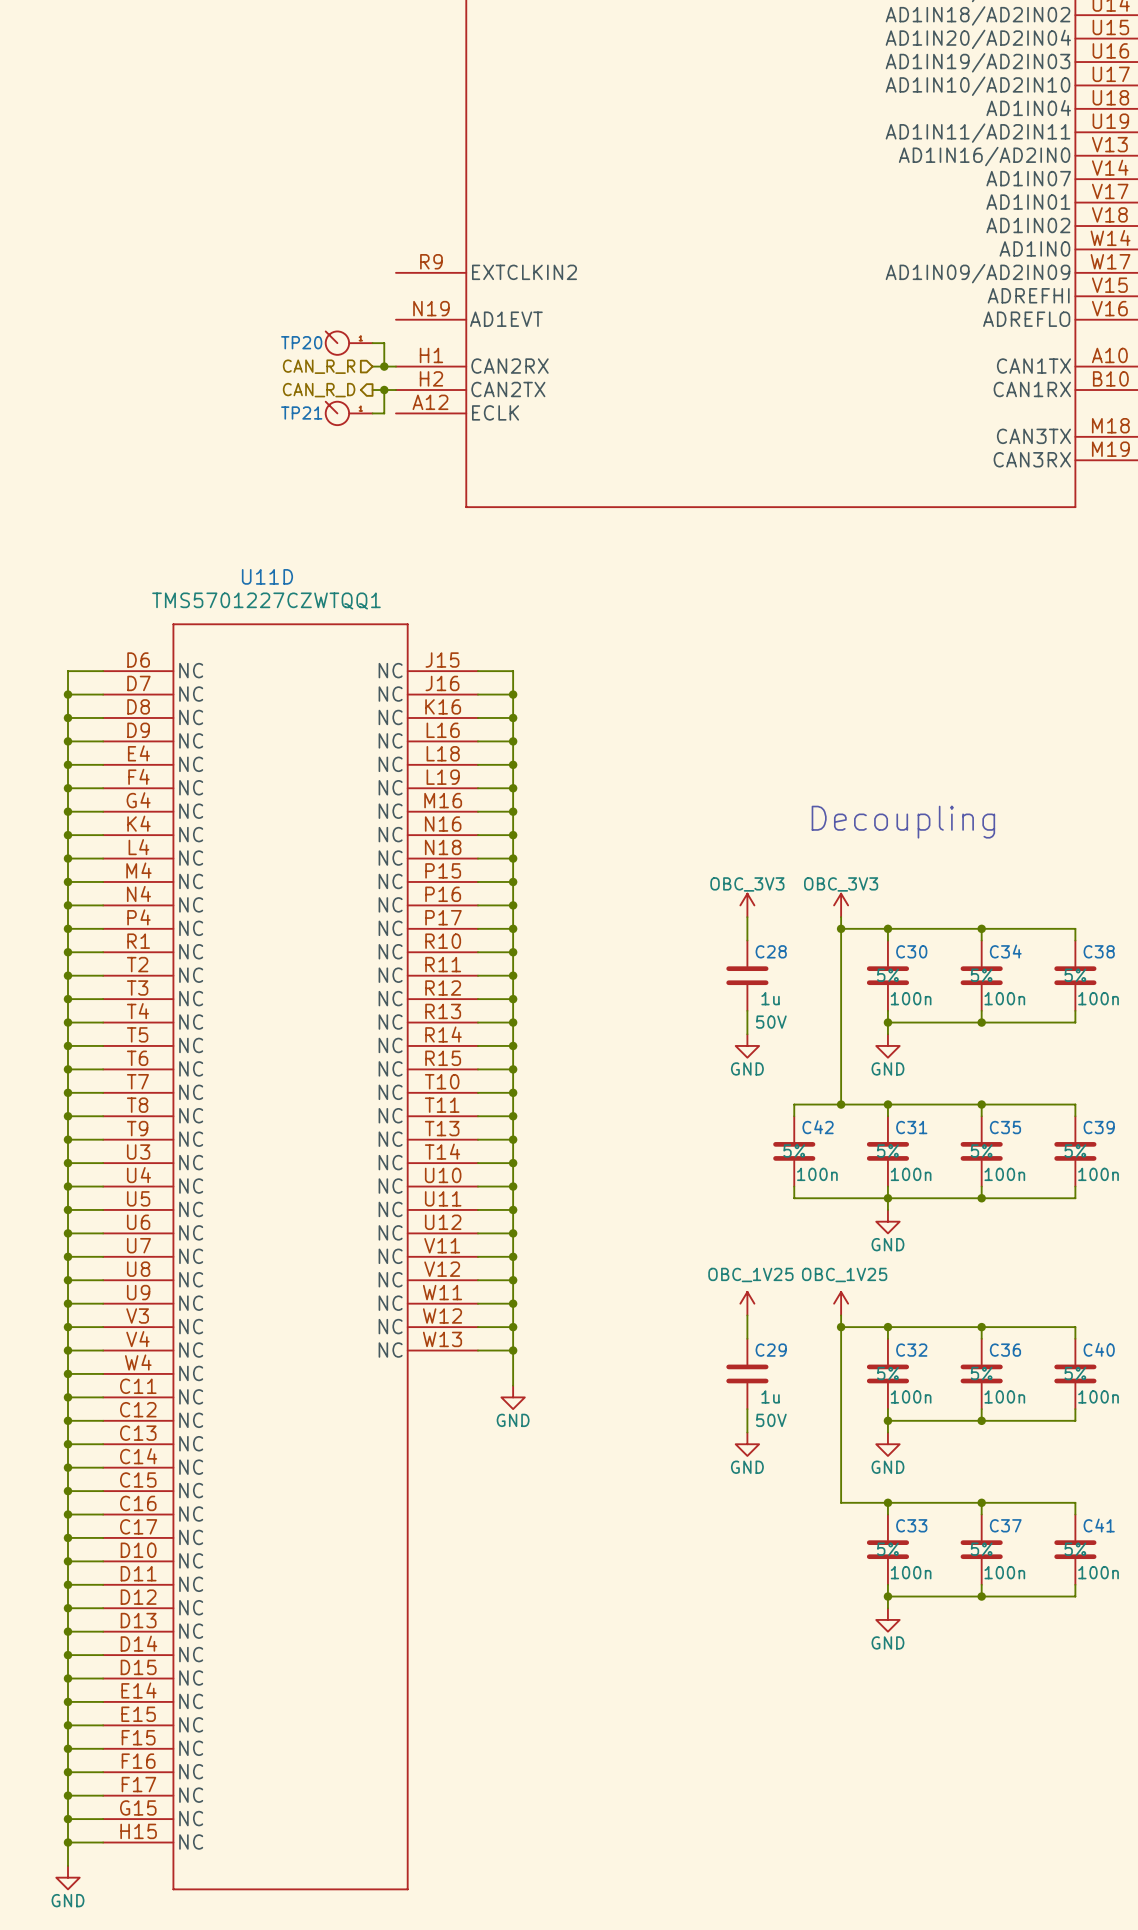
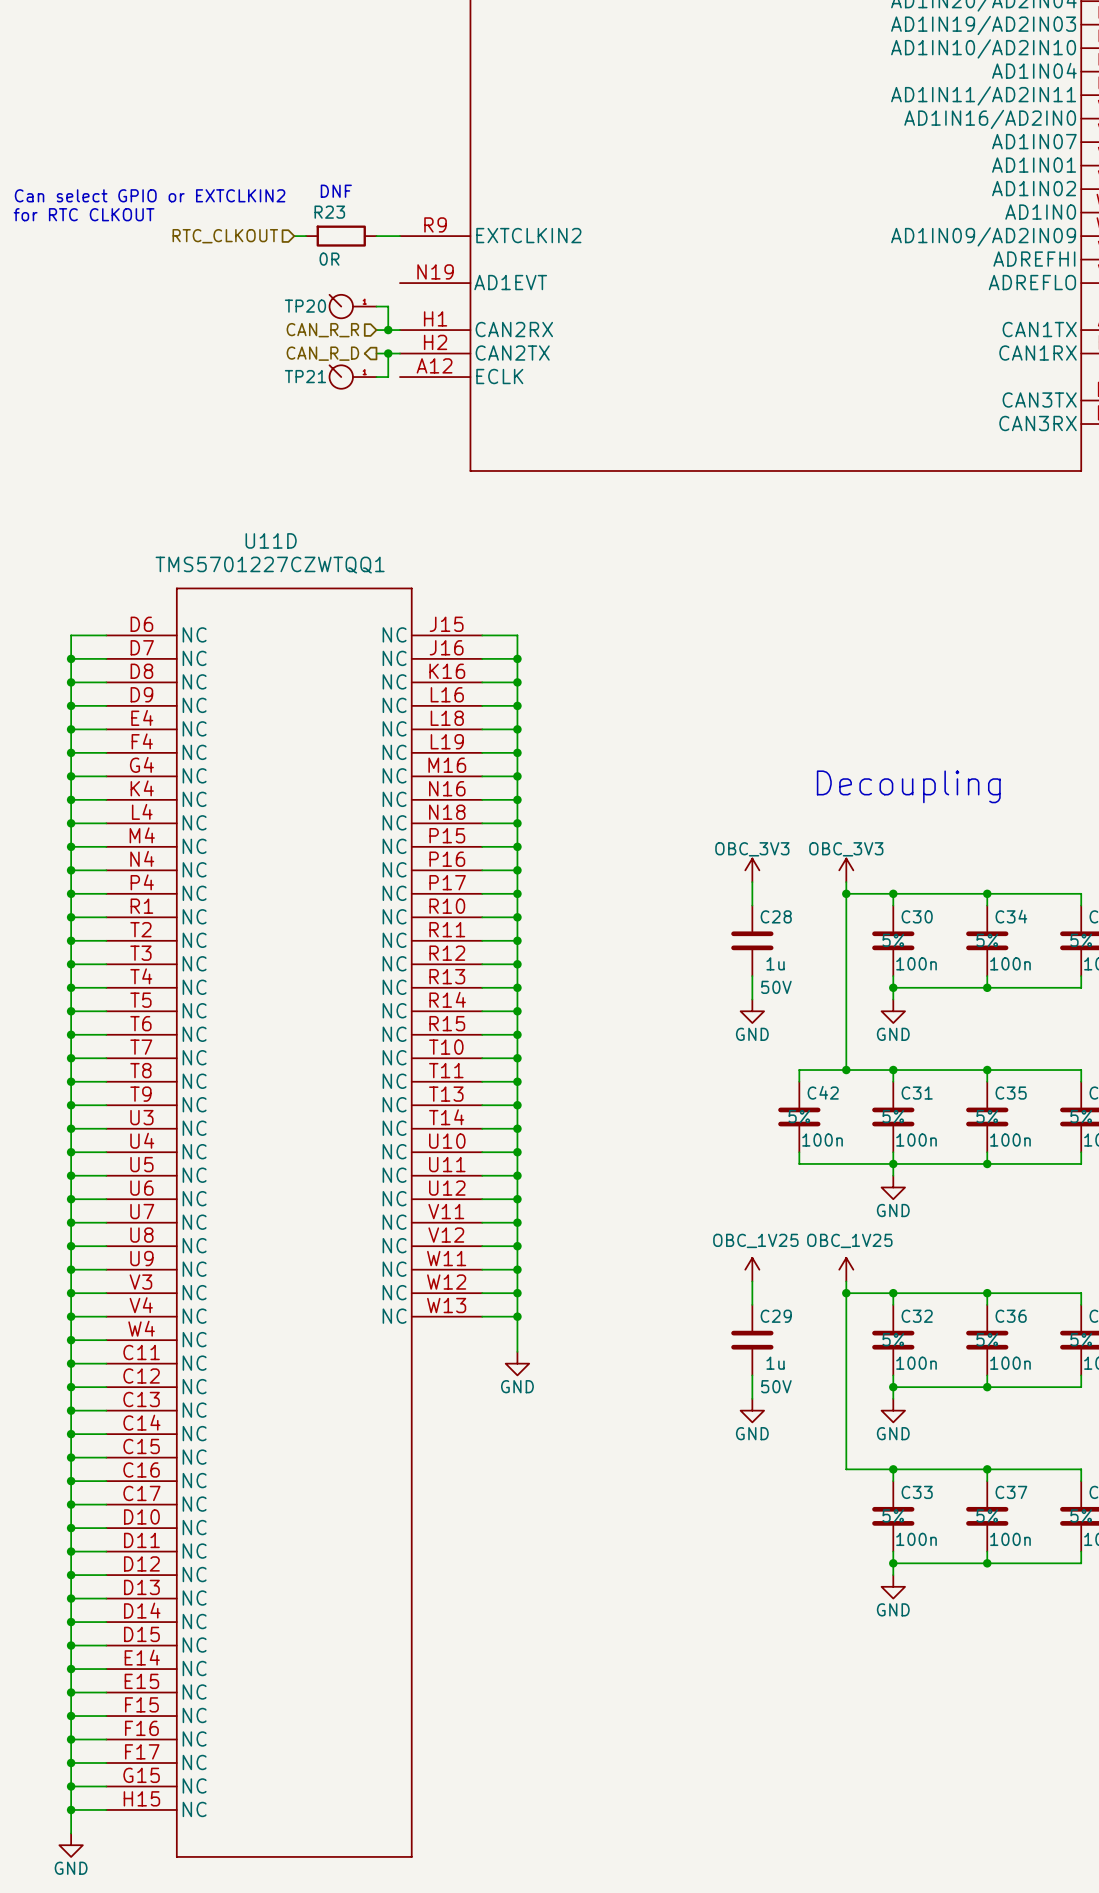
text: none -> DNF (336, 191)
text: none -> Can select GPIO or EXTCLKIN2 (150, 195)
text: none -> for RTC CLKOUT (84, 214)
hierarchical label: none -> RTC_CLKOUT (225, 236)
wire: none -> (294, 236) (306, 236)
R23: none -> (341, 236)
wire: none -> (376, 236) (399, 236)

